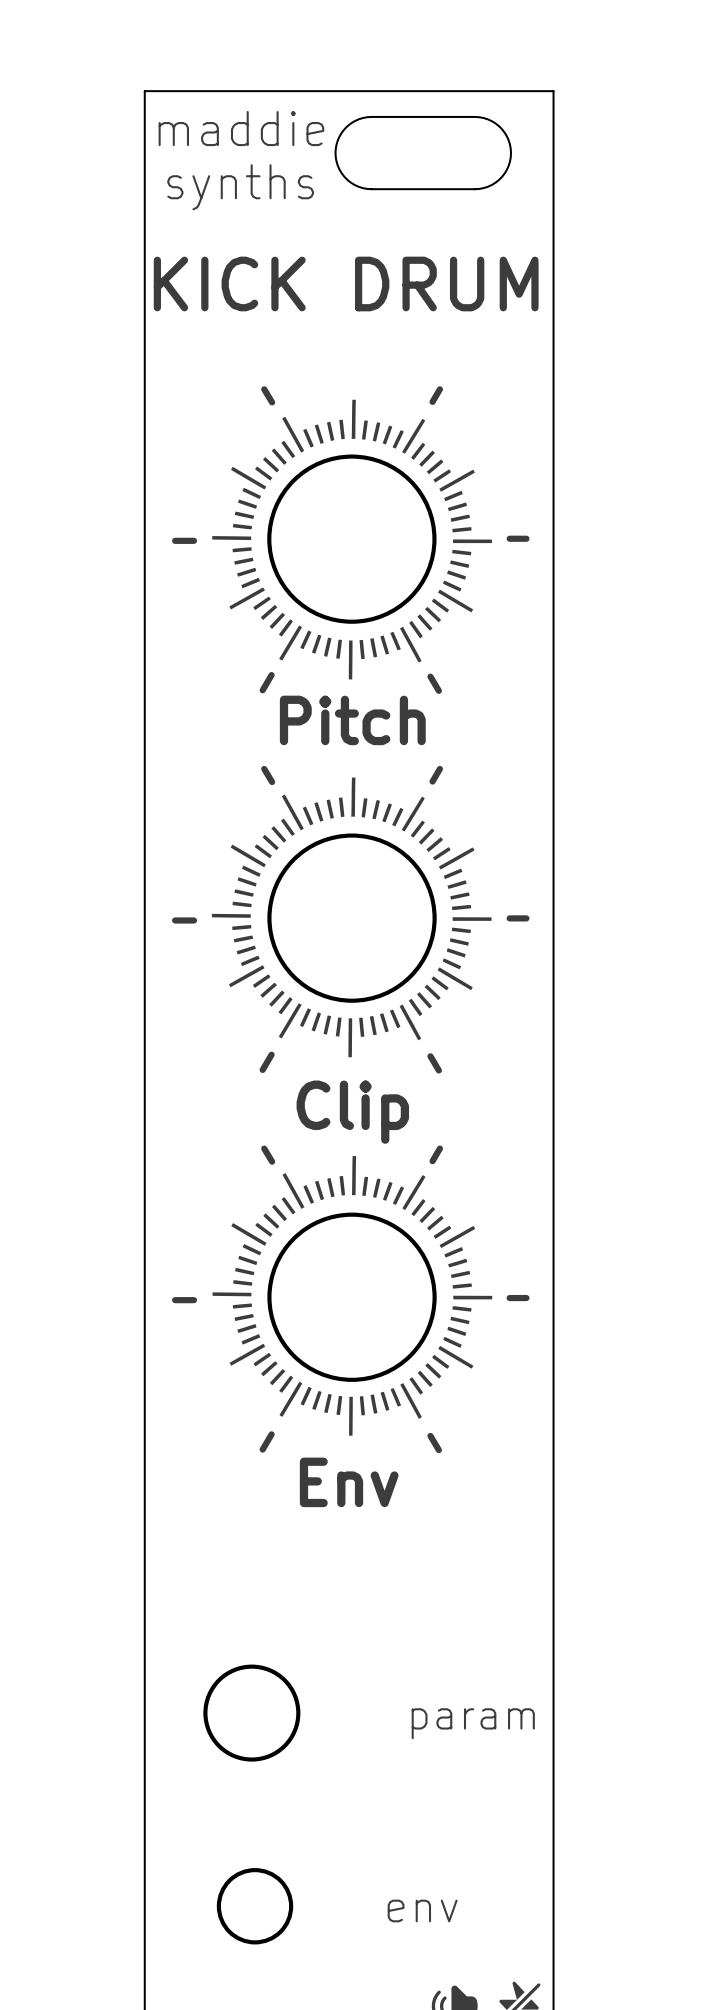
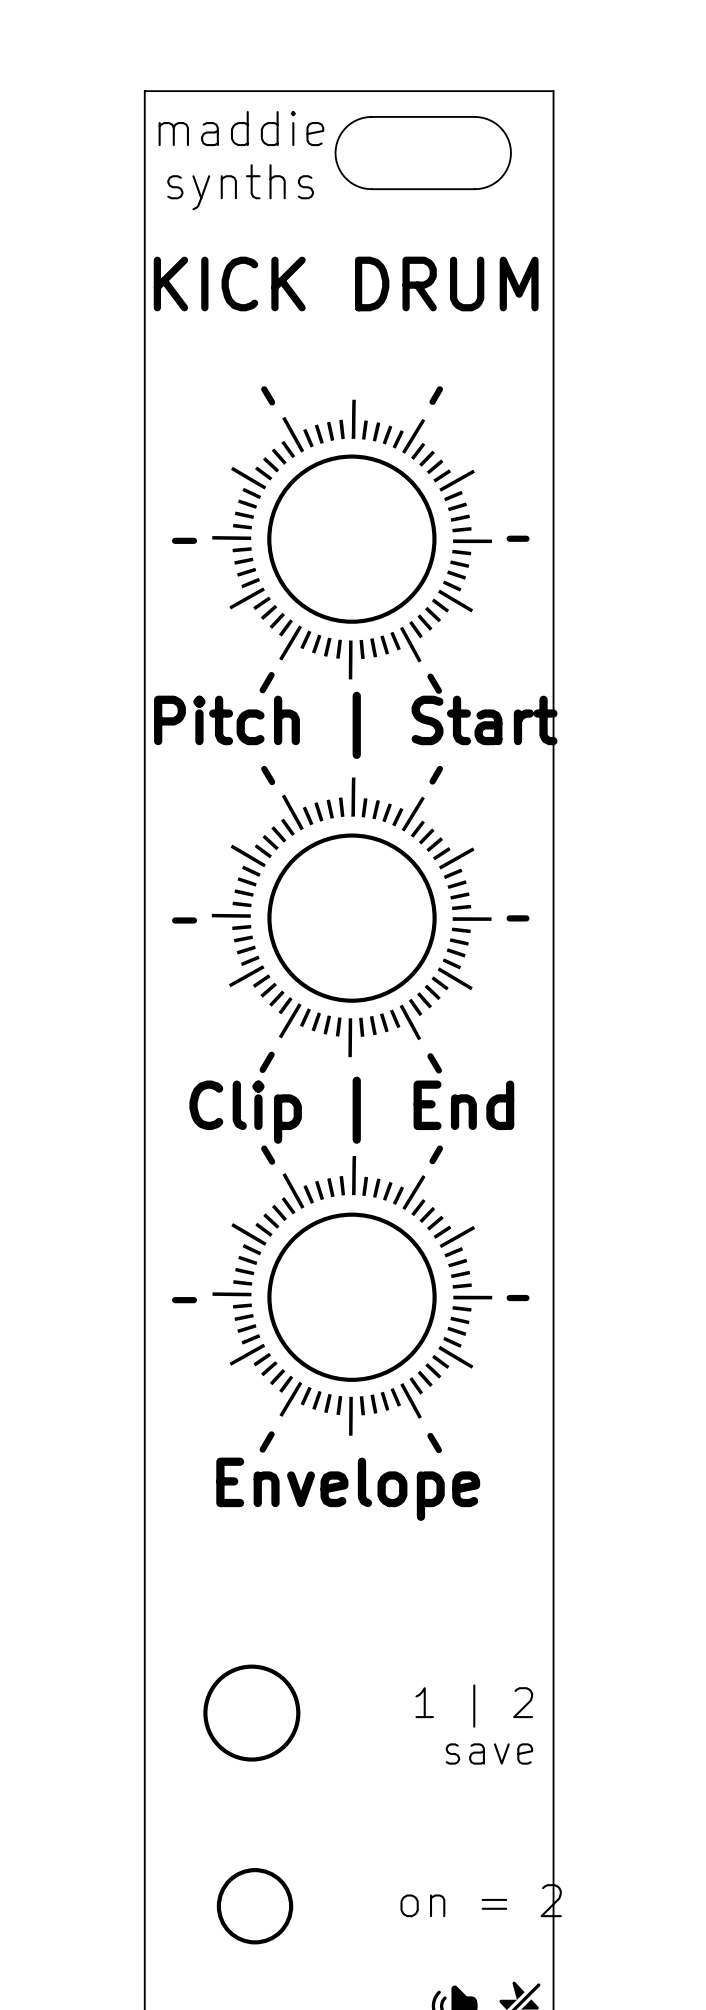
text: Pitch (352, 720) -> Pitch | Start (355, 725)
text: Clip (352, 1112) -> Clip | End (351, 1110)
text: Env (349, 1482) -> Envelope (348, 1489)
text: param (473, 1723) -> 1 | 2 (474, 1706)
text: none -> save (489, 1753)
text: none -> on = 2 (481, 1900)
text: env (422, 1910) -> none

